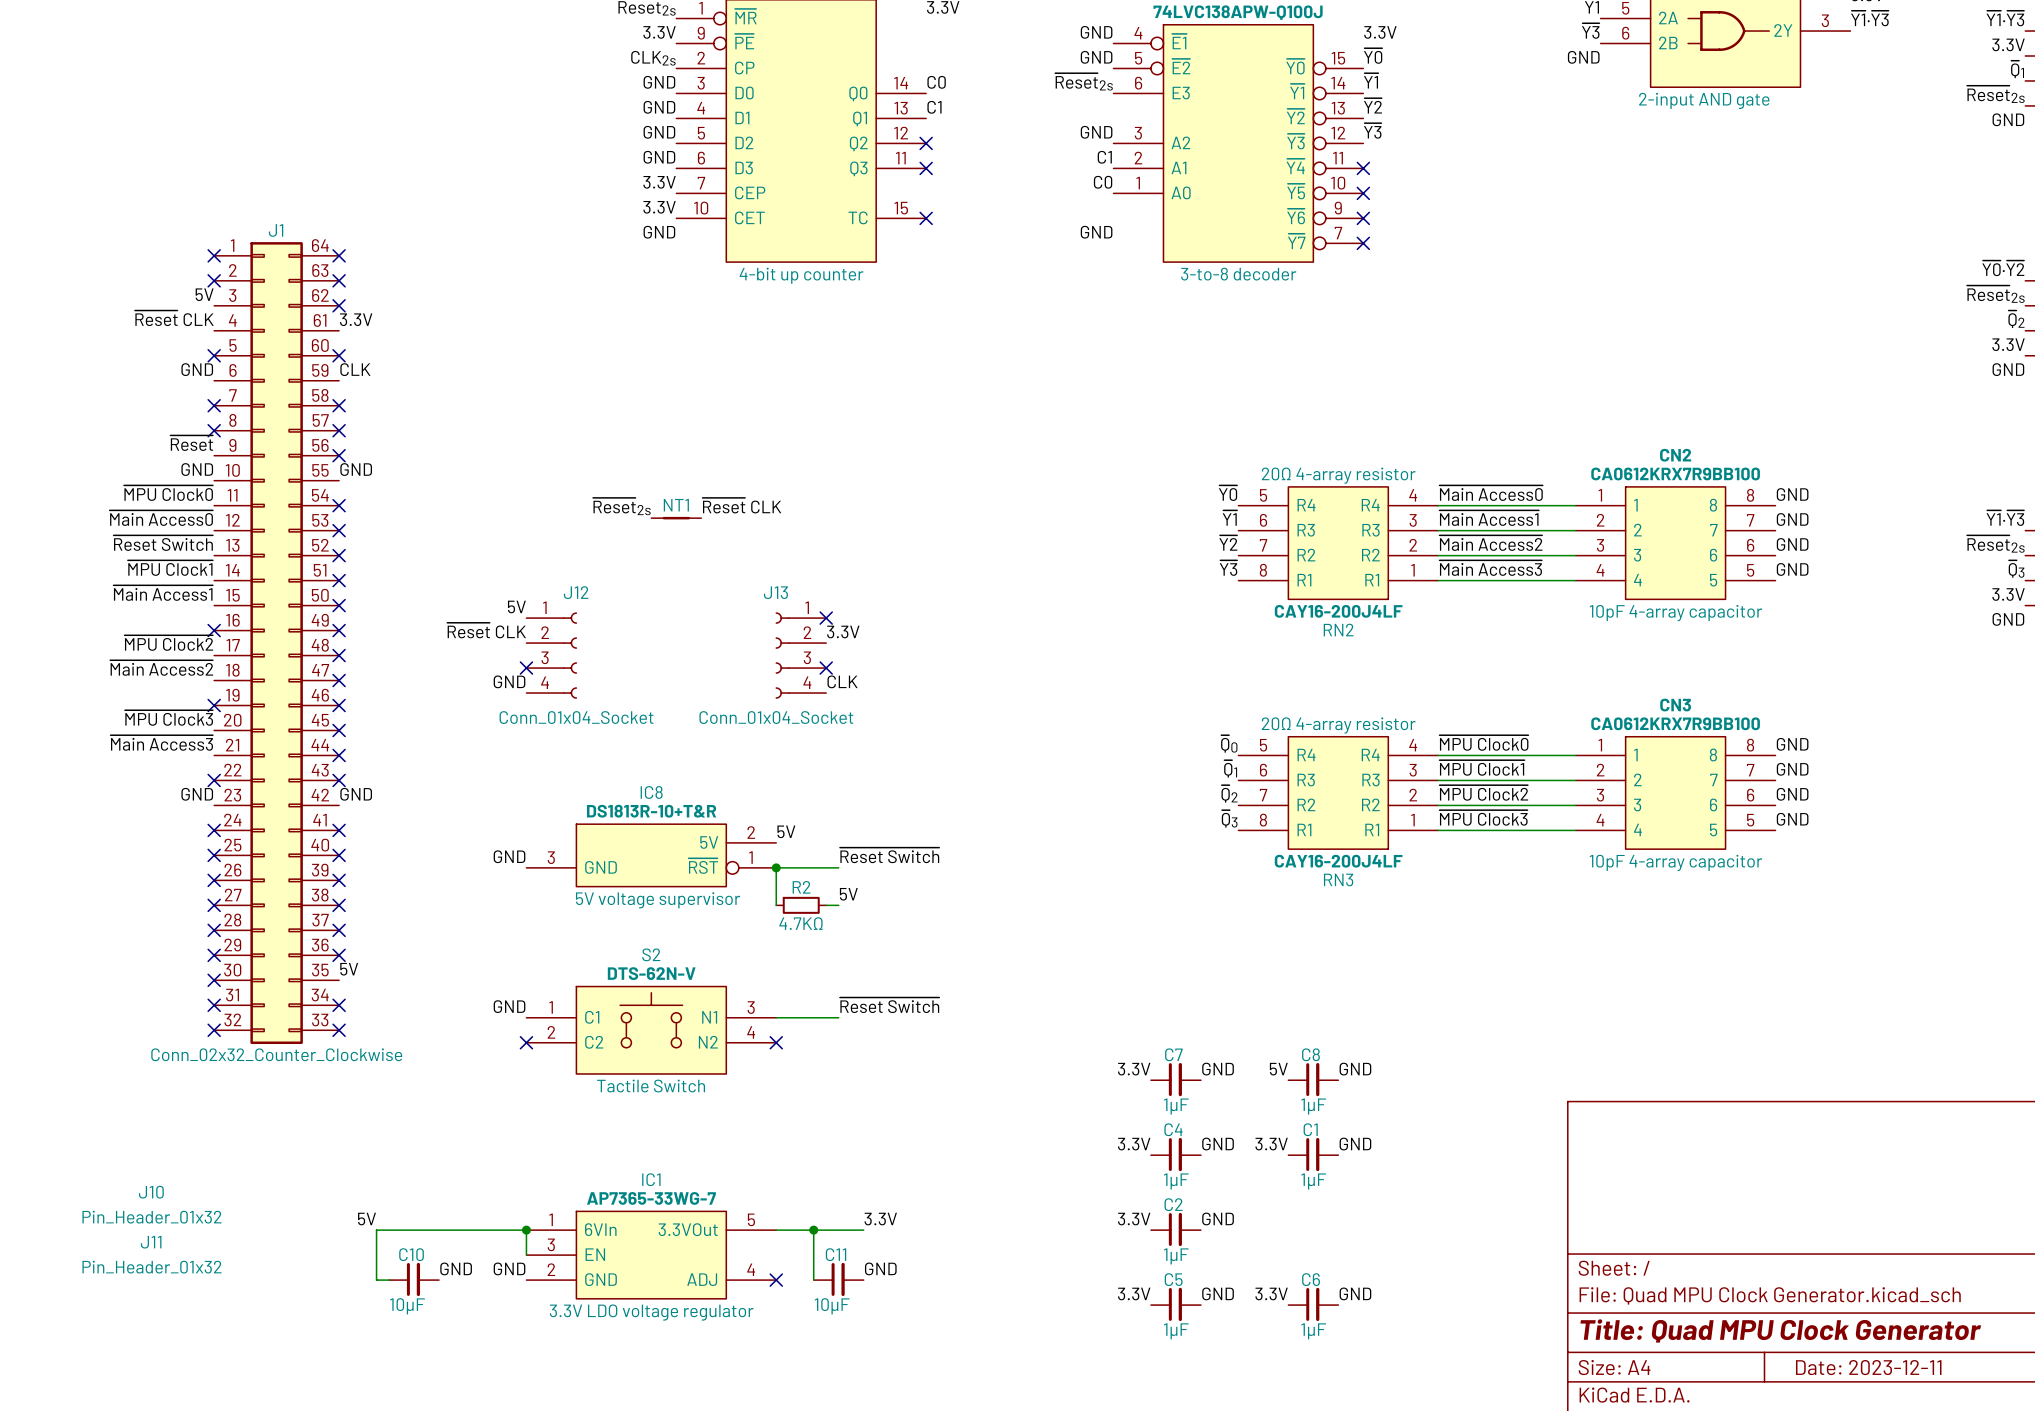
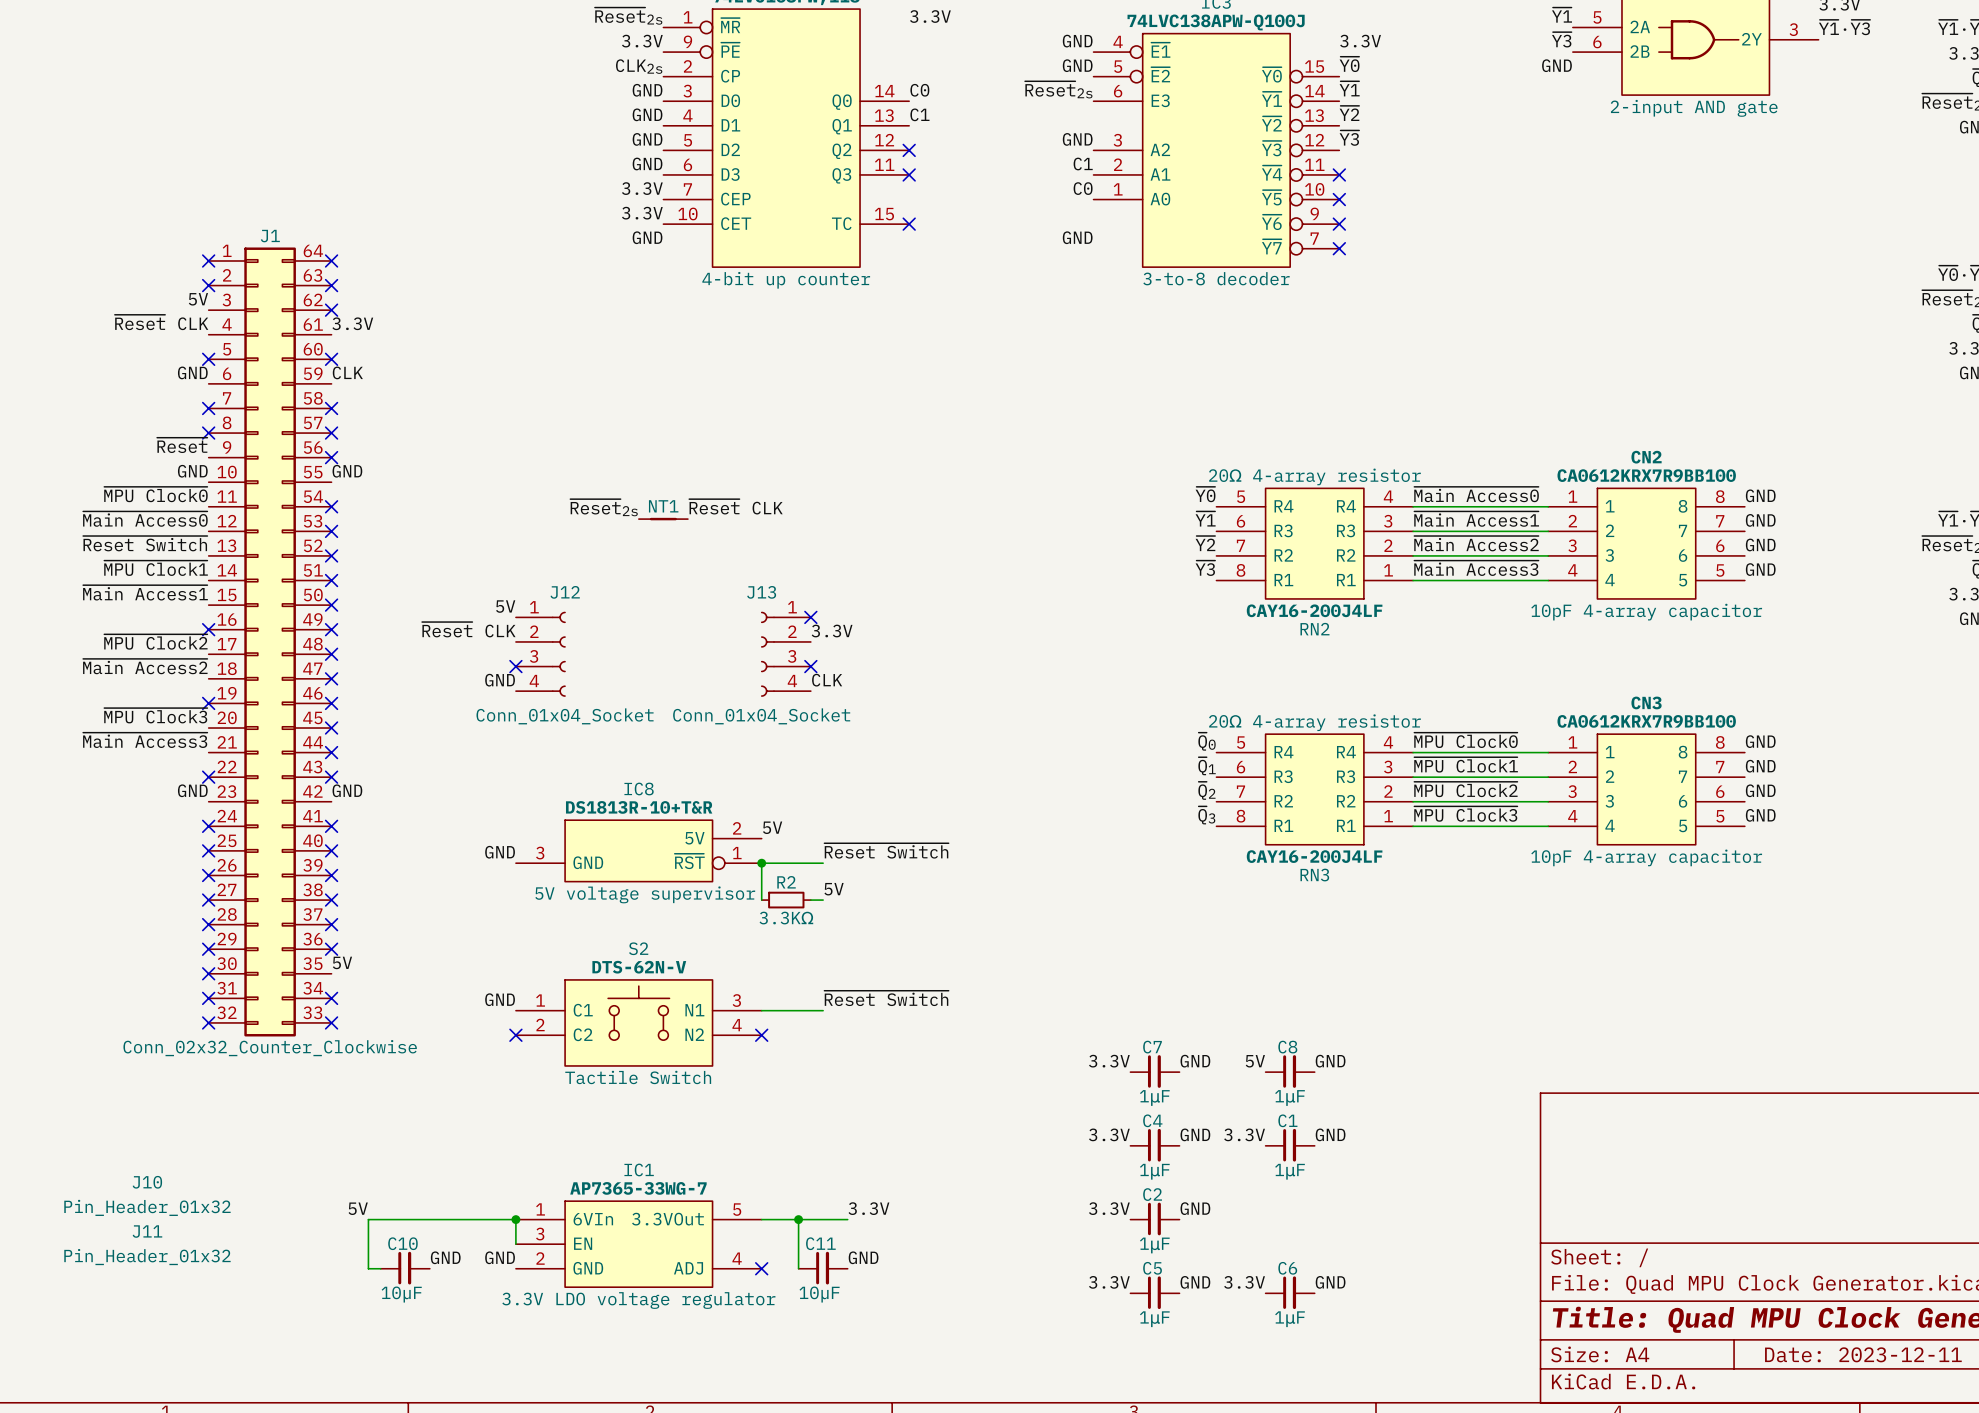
R2 value: 4.7KΩ (801, 923) -> 3.3KΩ (786, 918)

